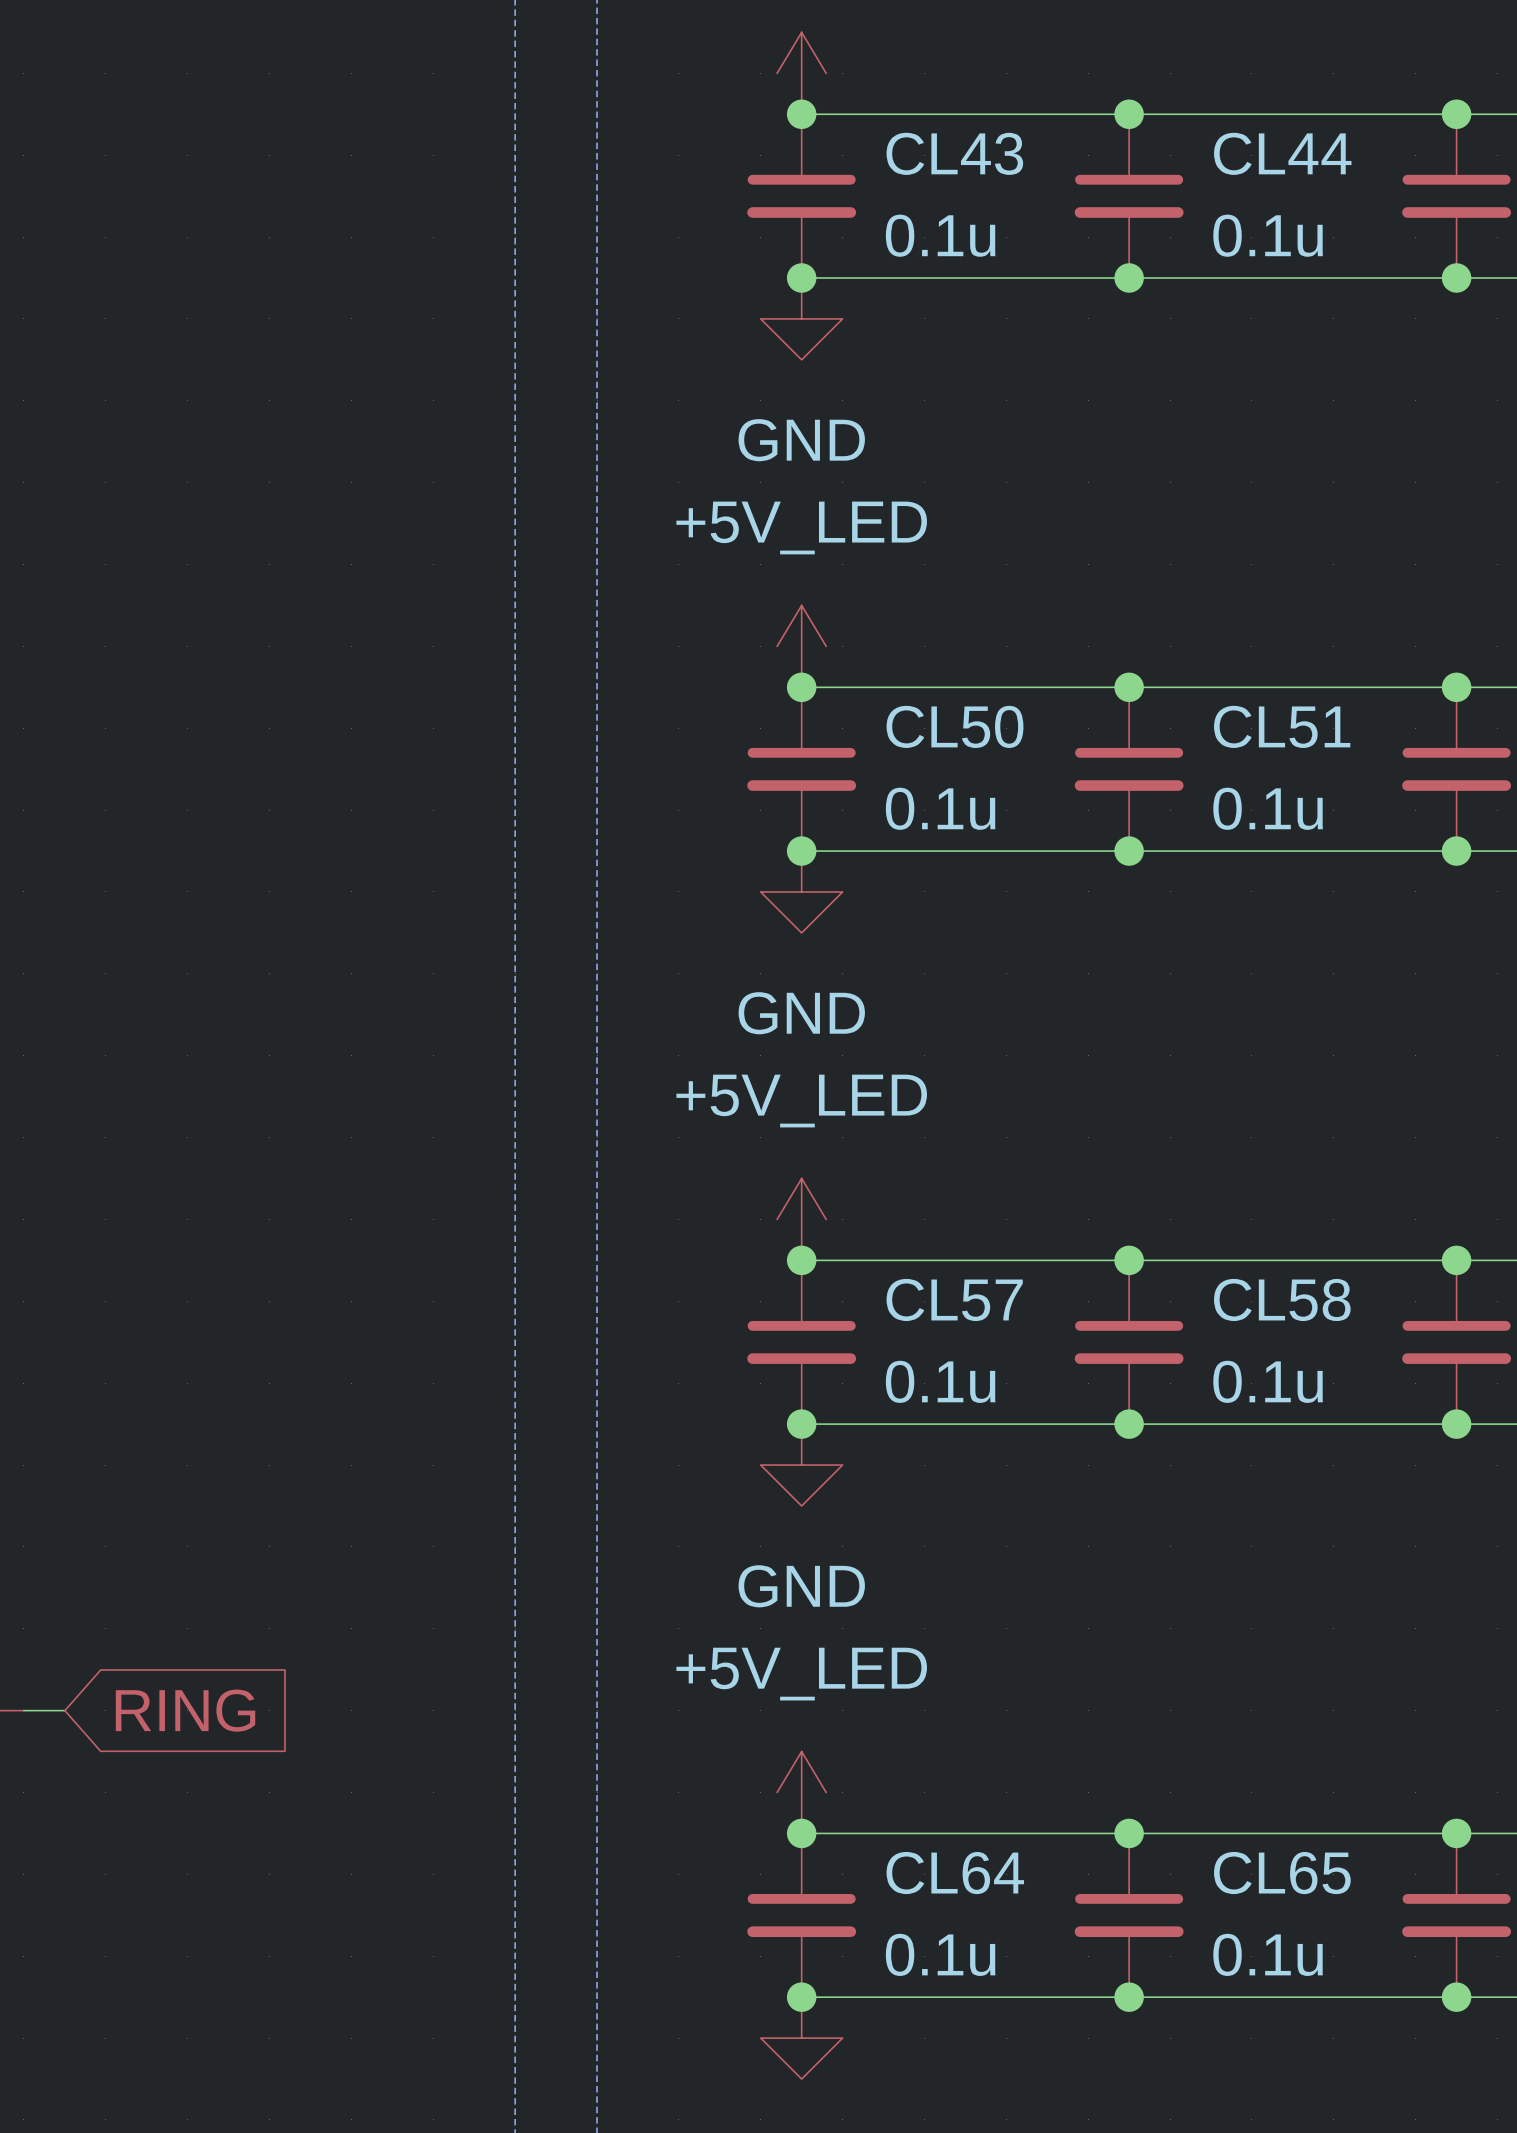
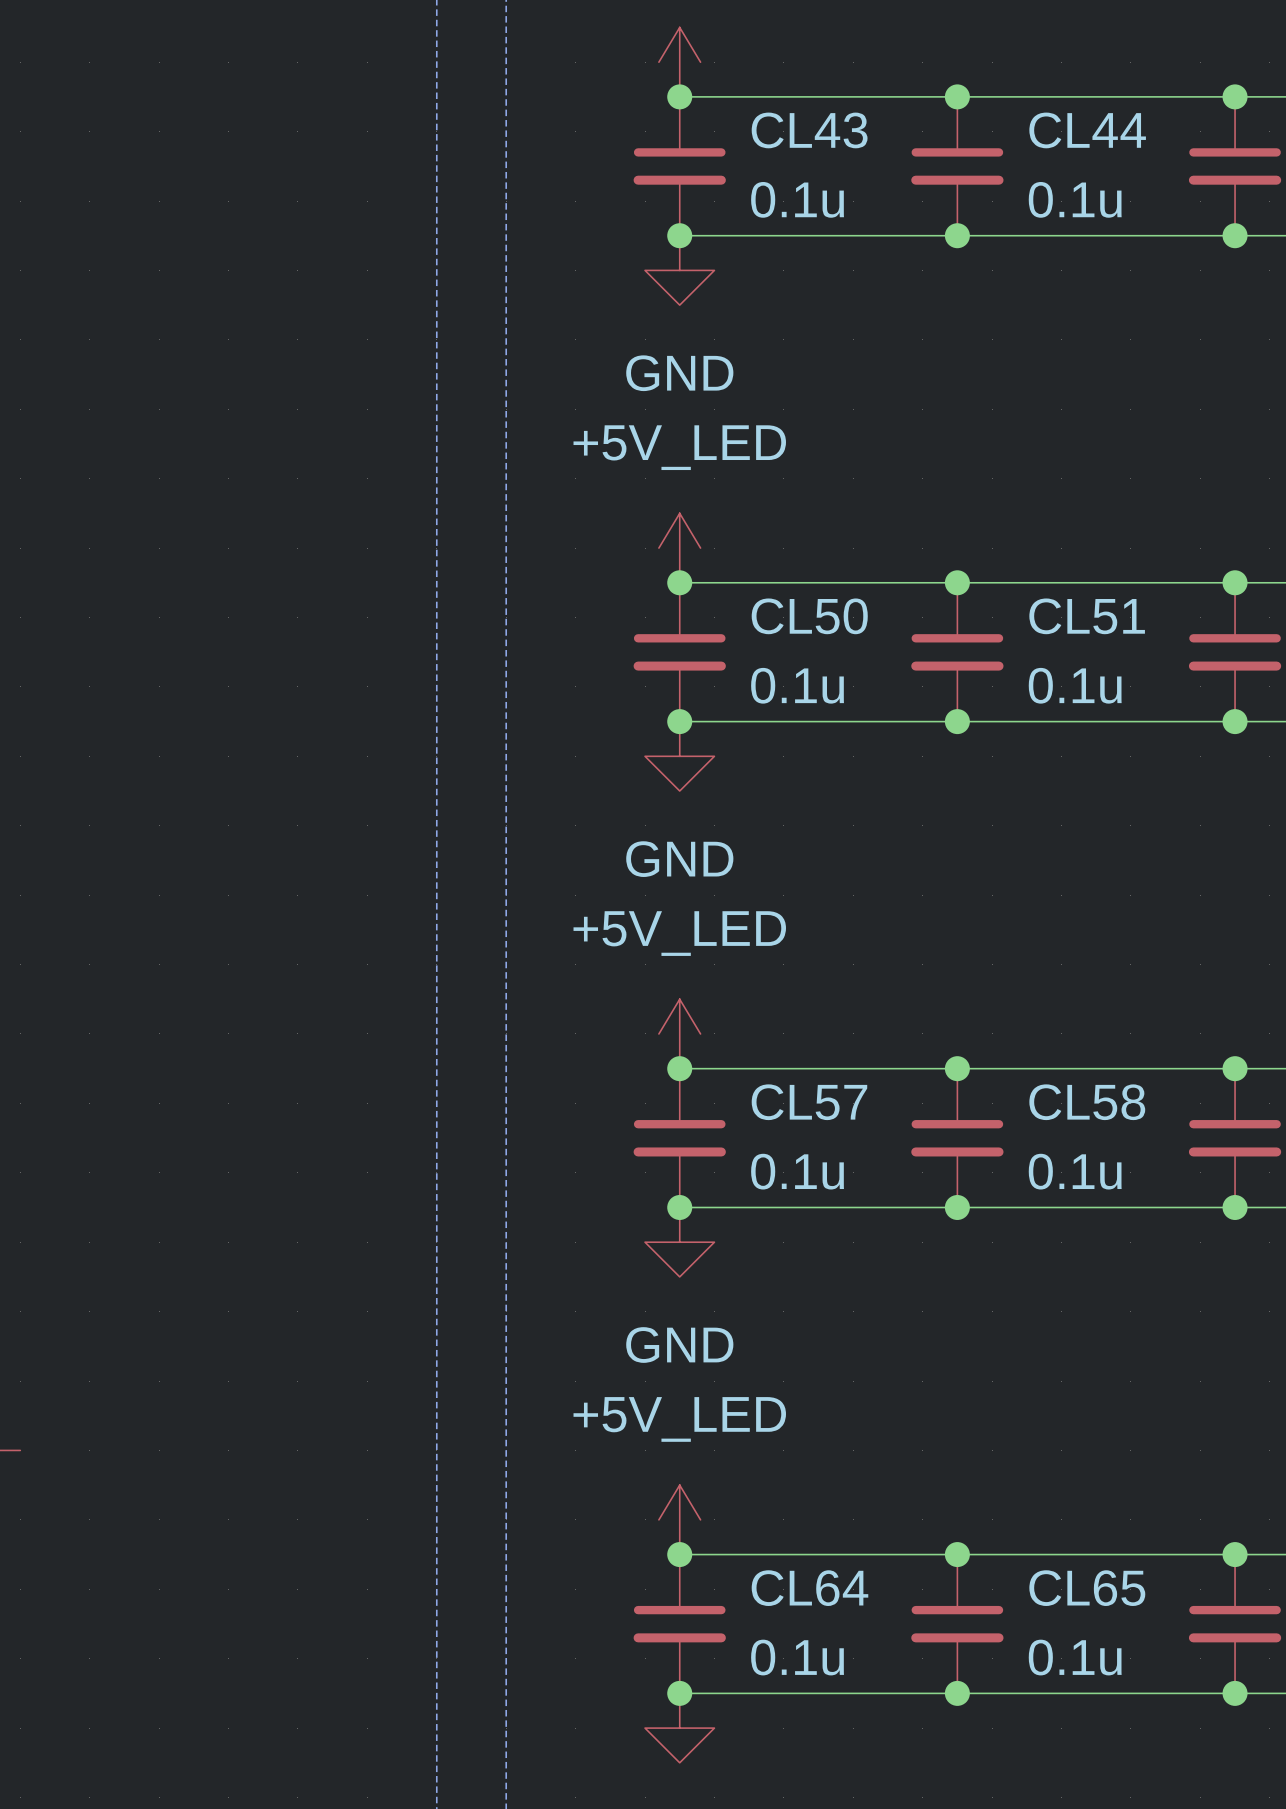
wire: (23, 1710) (64, 1710) -> none
global label: RING (185, 1710) -> none

